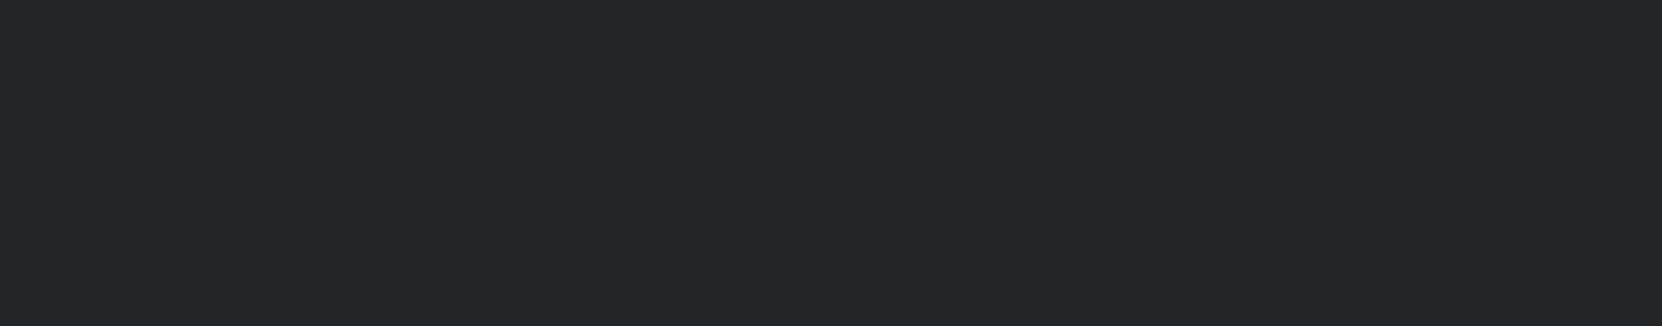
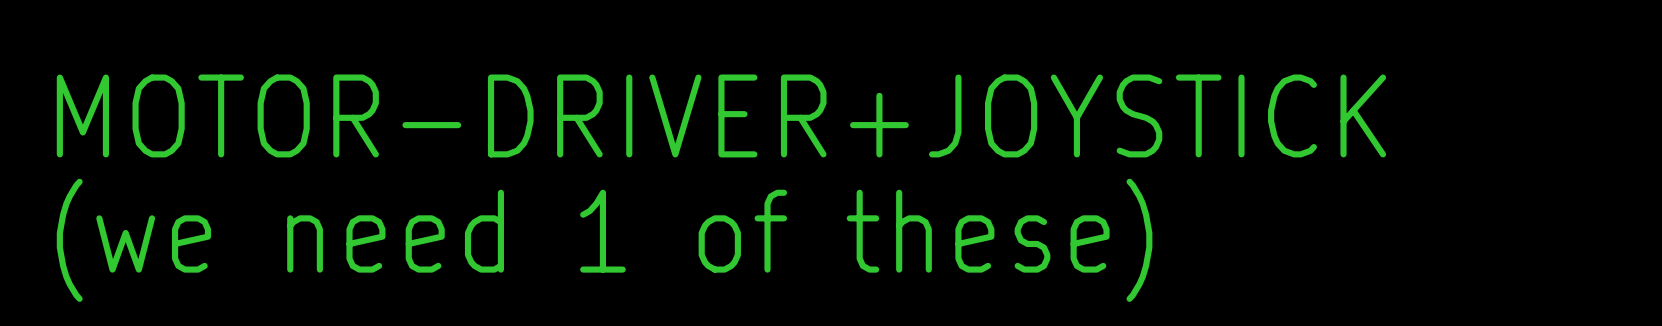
text: none -> MOTOR-DRIVER+JOYSTICK (721, 115)
text: none -> (we need 1 of these) (604, 240)

